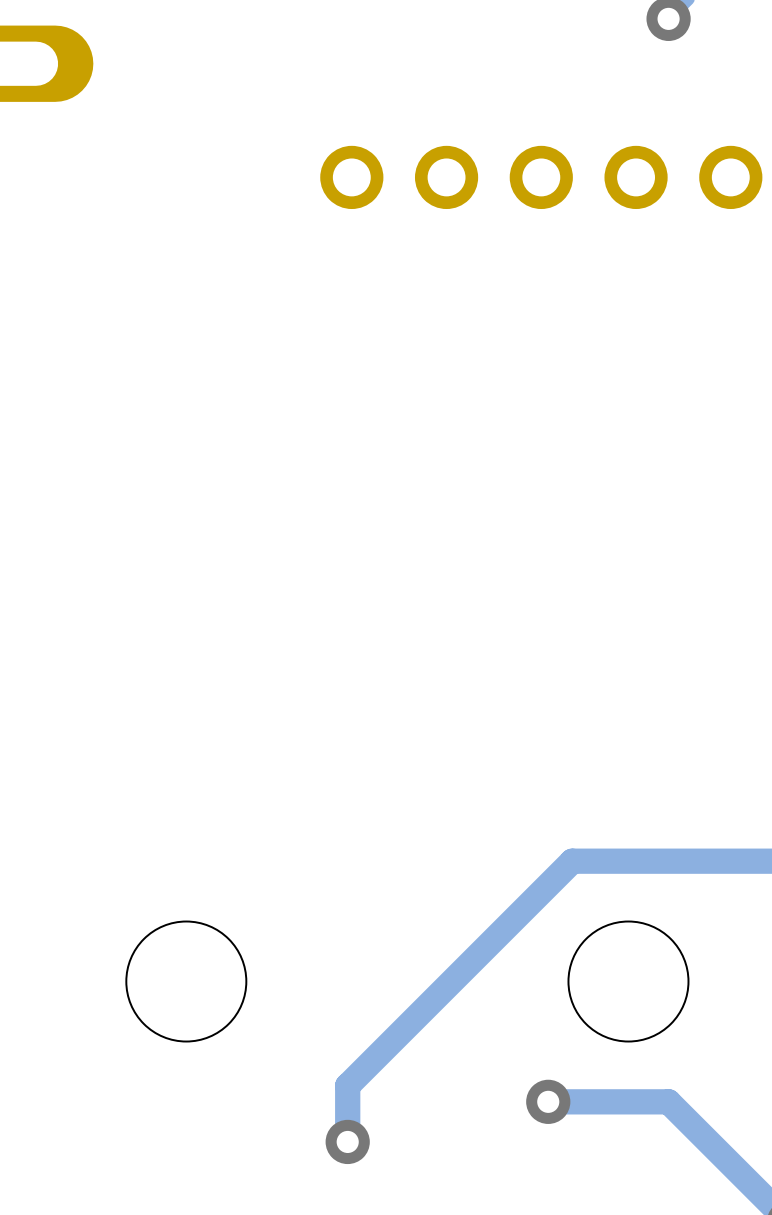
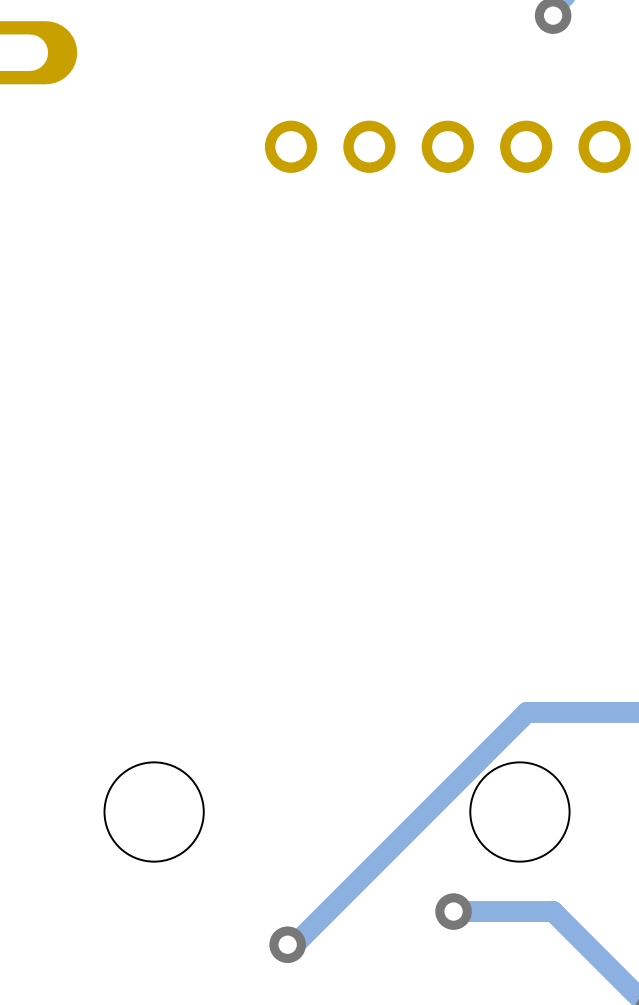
track: (636, 861) (572, 861) (347, 1085) (347, 1141) -> (526, 712) (294, 944) (287, 944)

